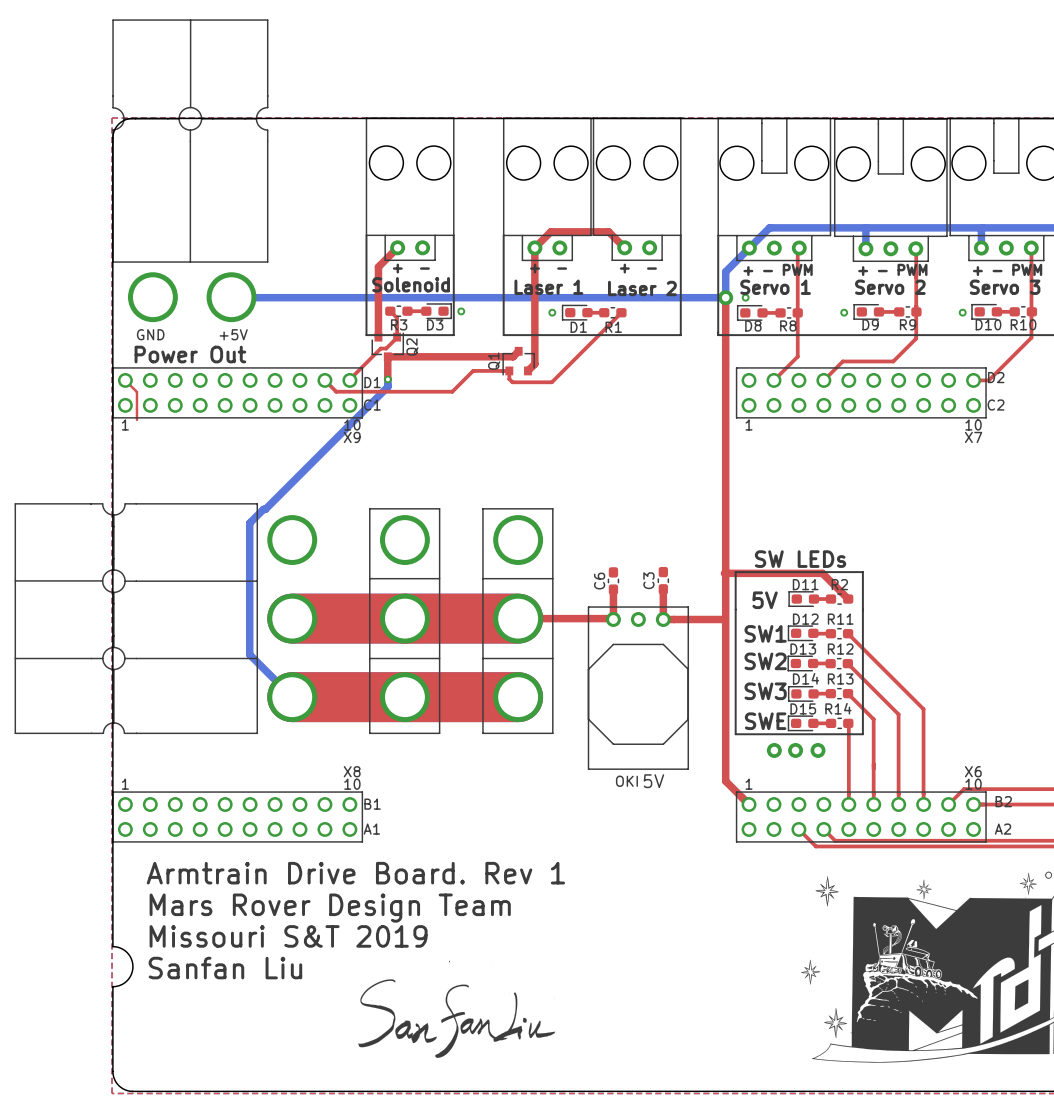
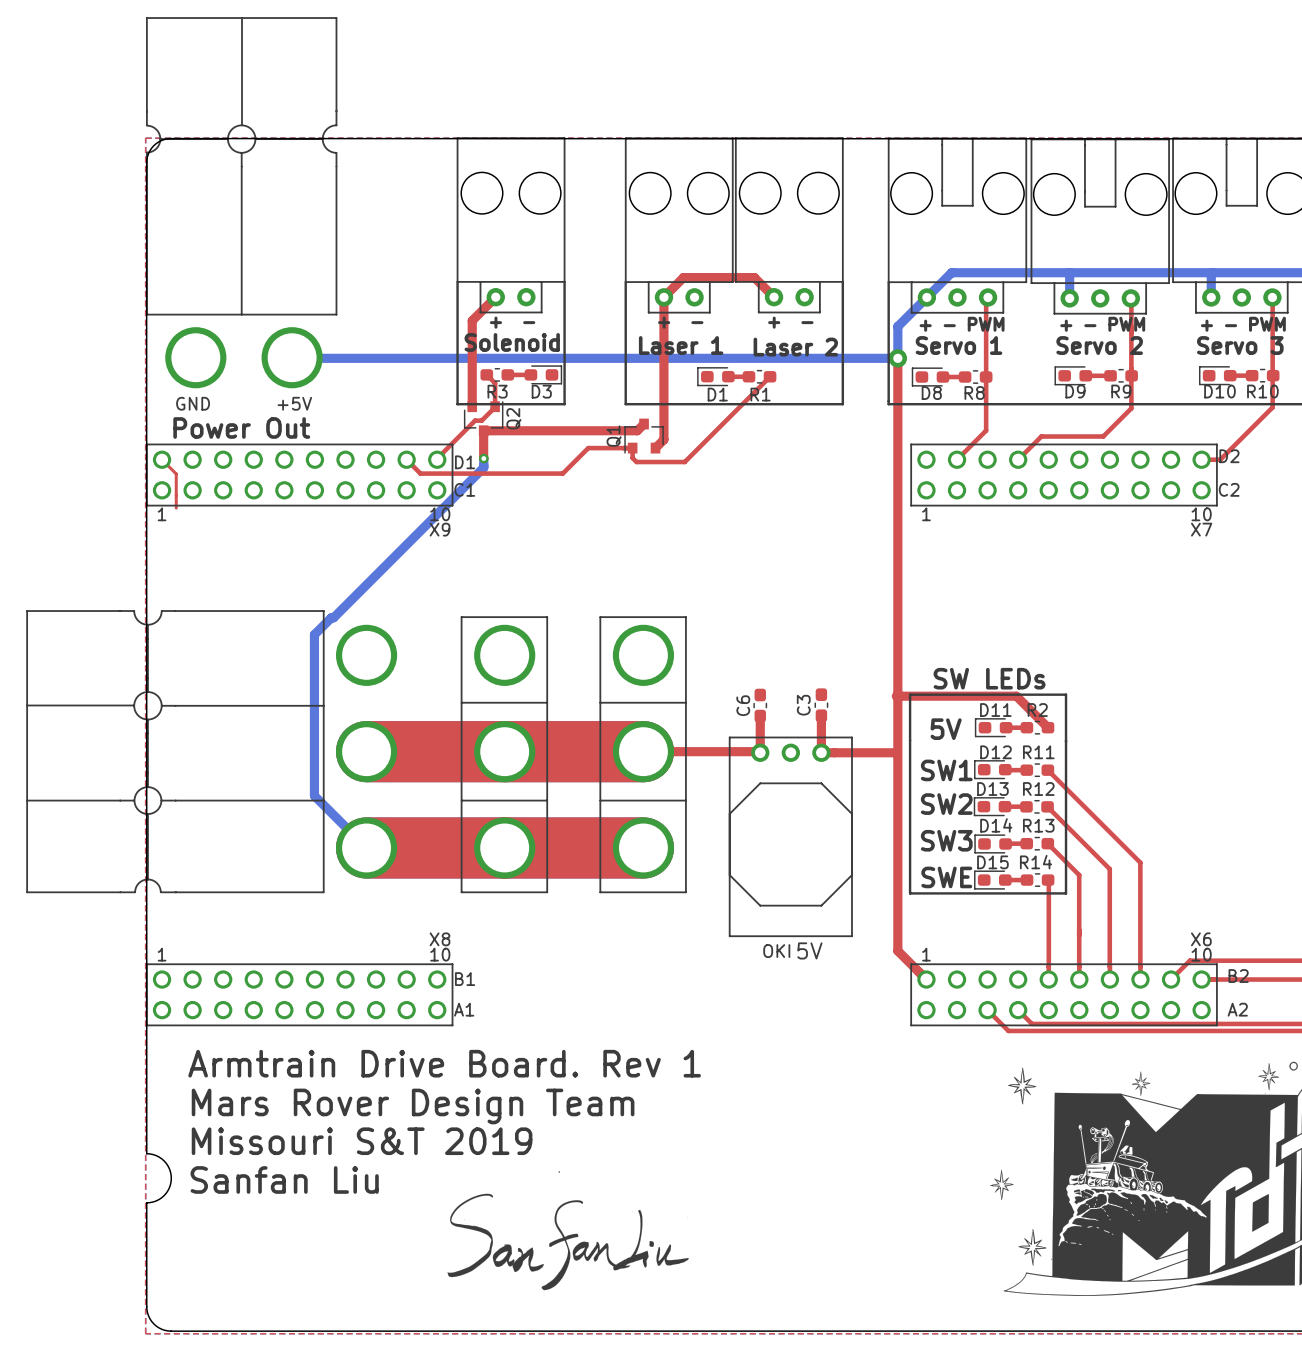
via: (745, 297) -> none
via: (461, 311) -> none
via: (552, 312) -> none
via: (844, 312) -> none
via: (962, 312) -> none
via: (774, 750) -> none
via: (795, 750) -> none
via: (818, 750) -> none

